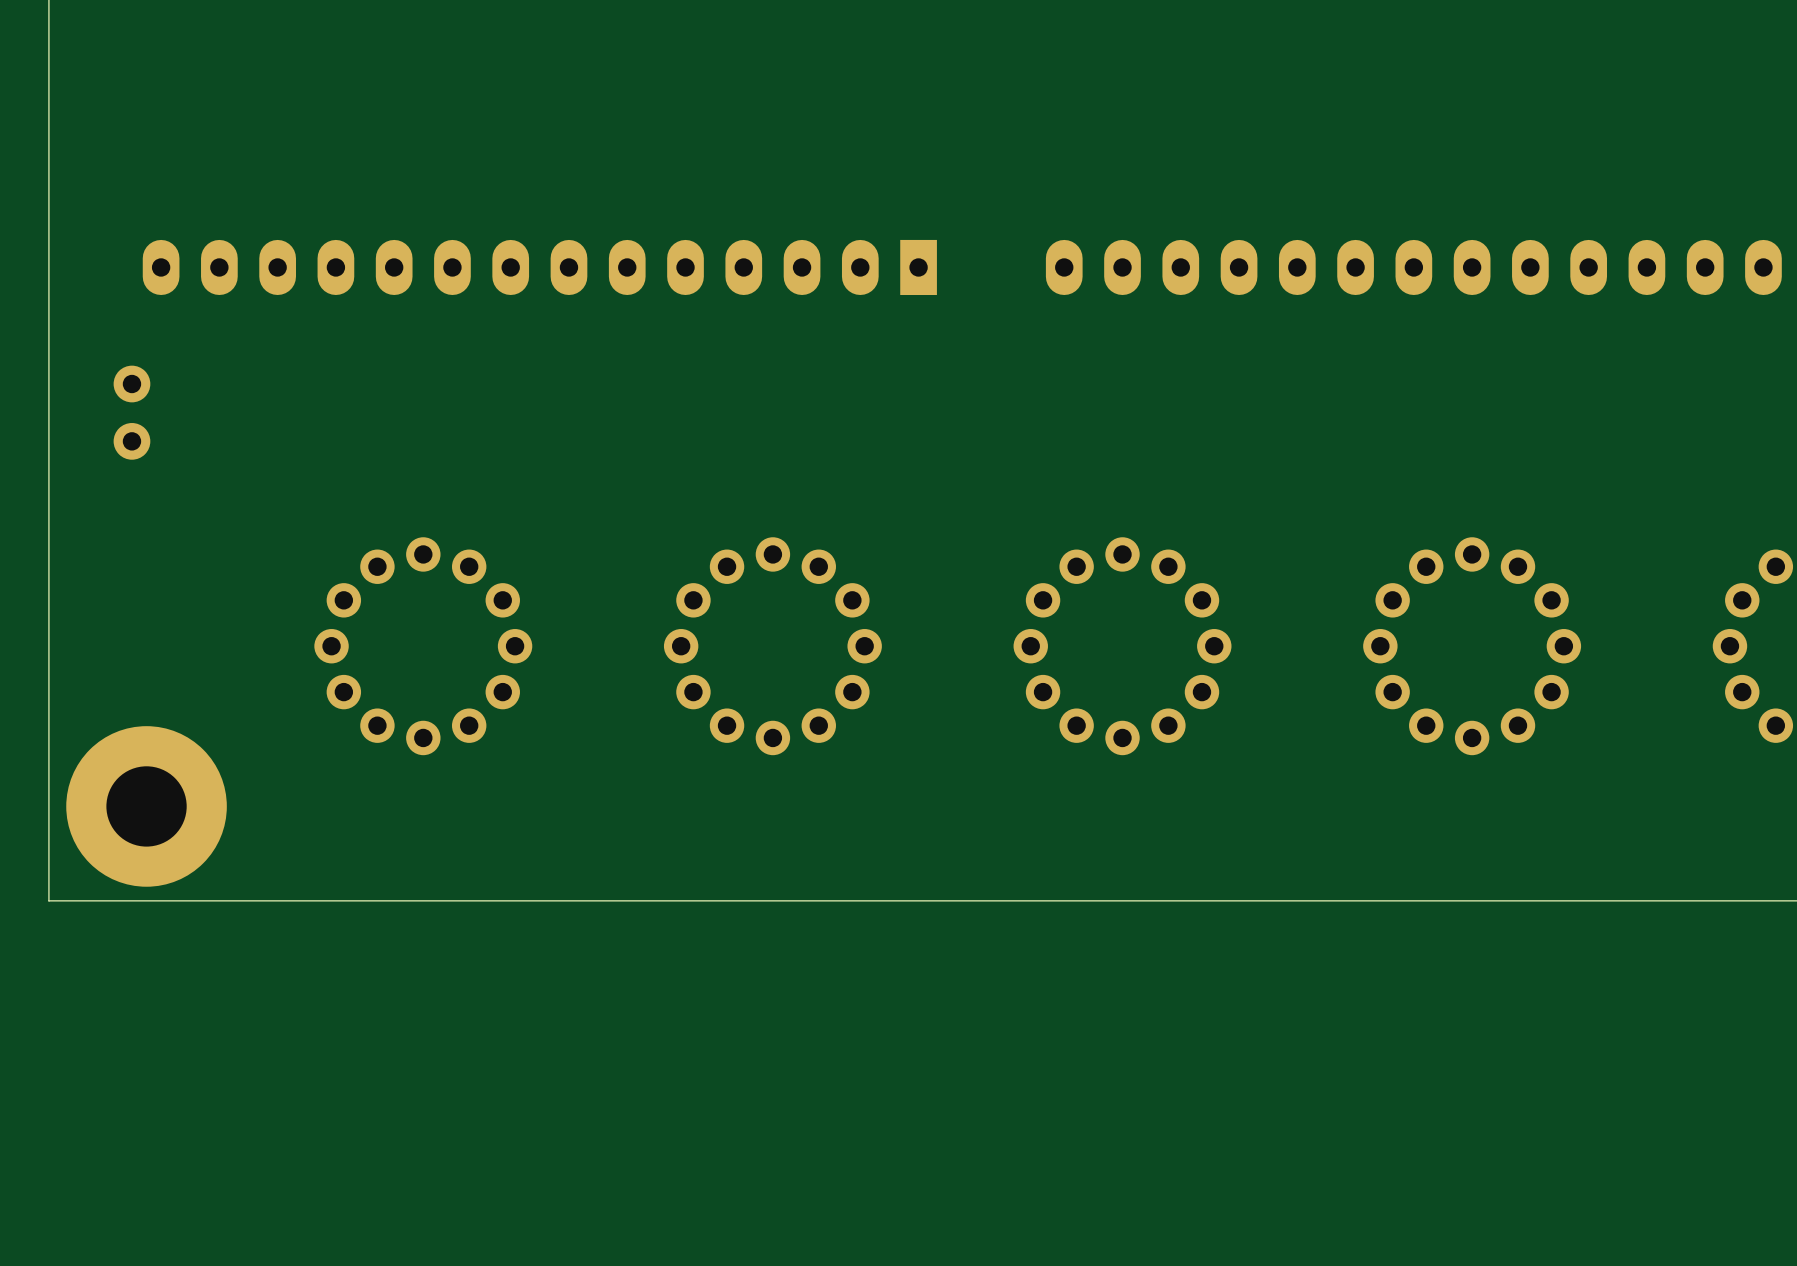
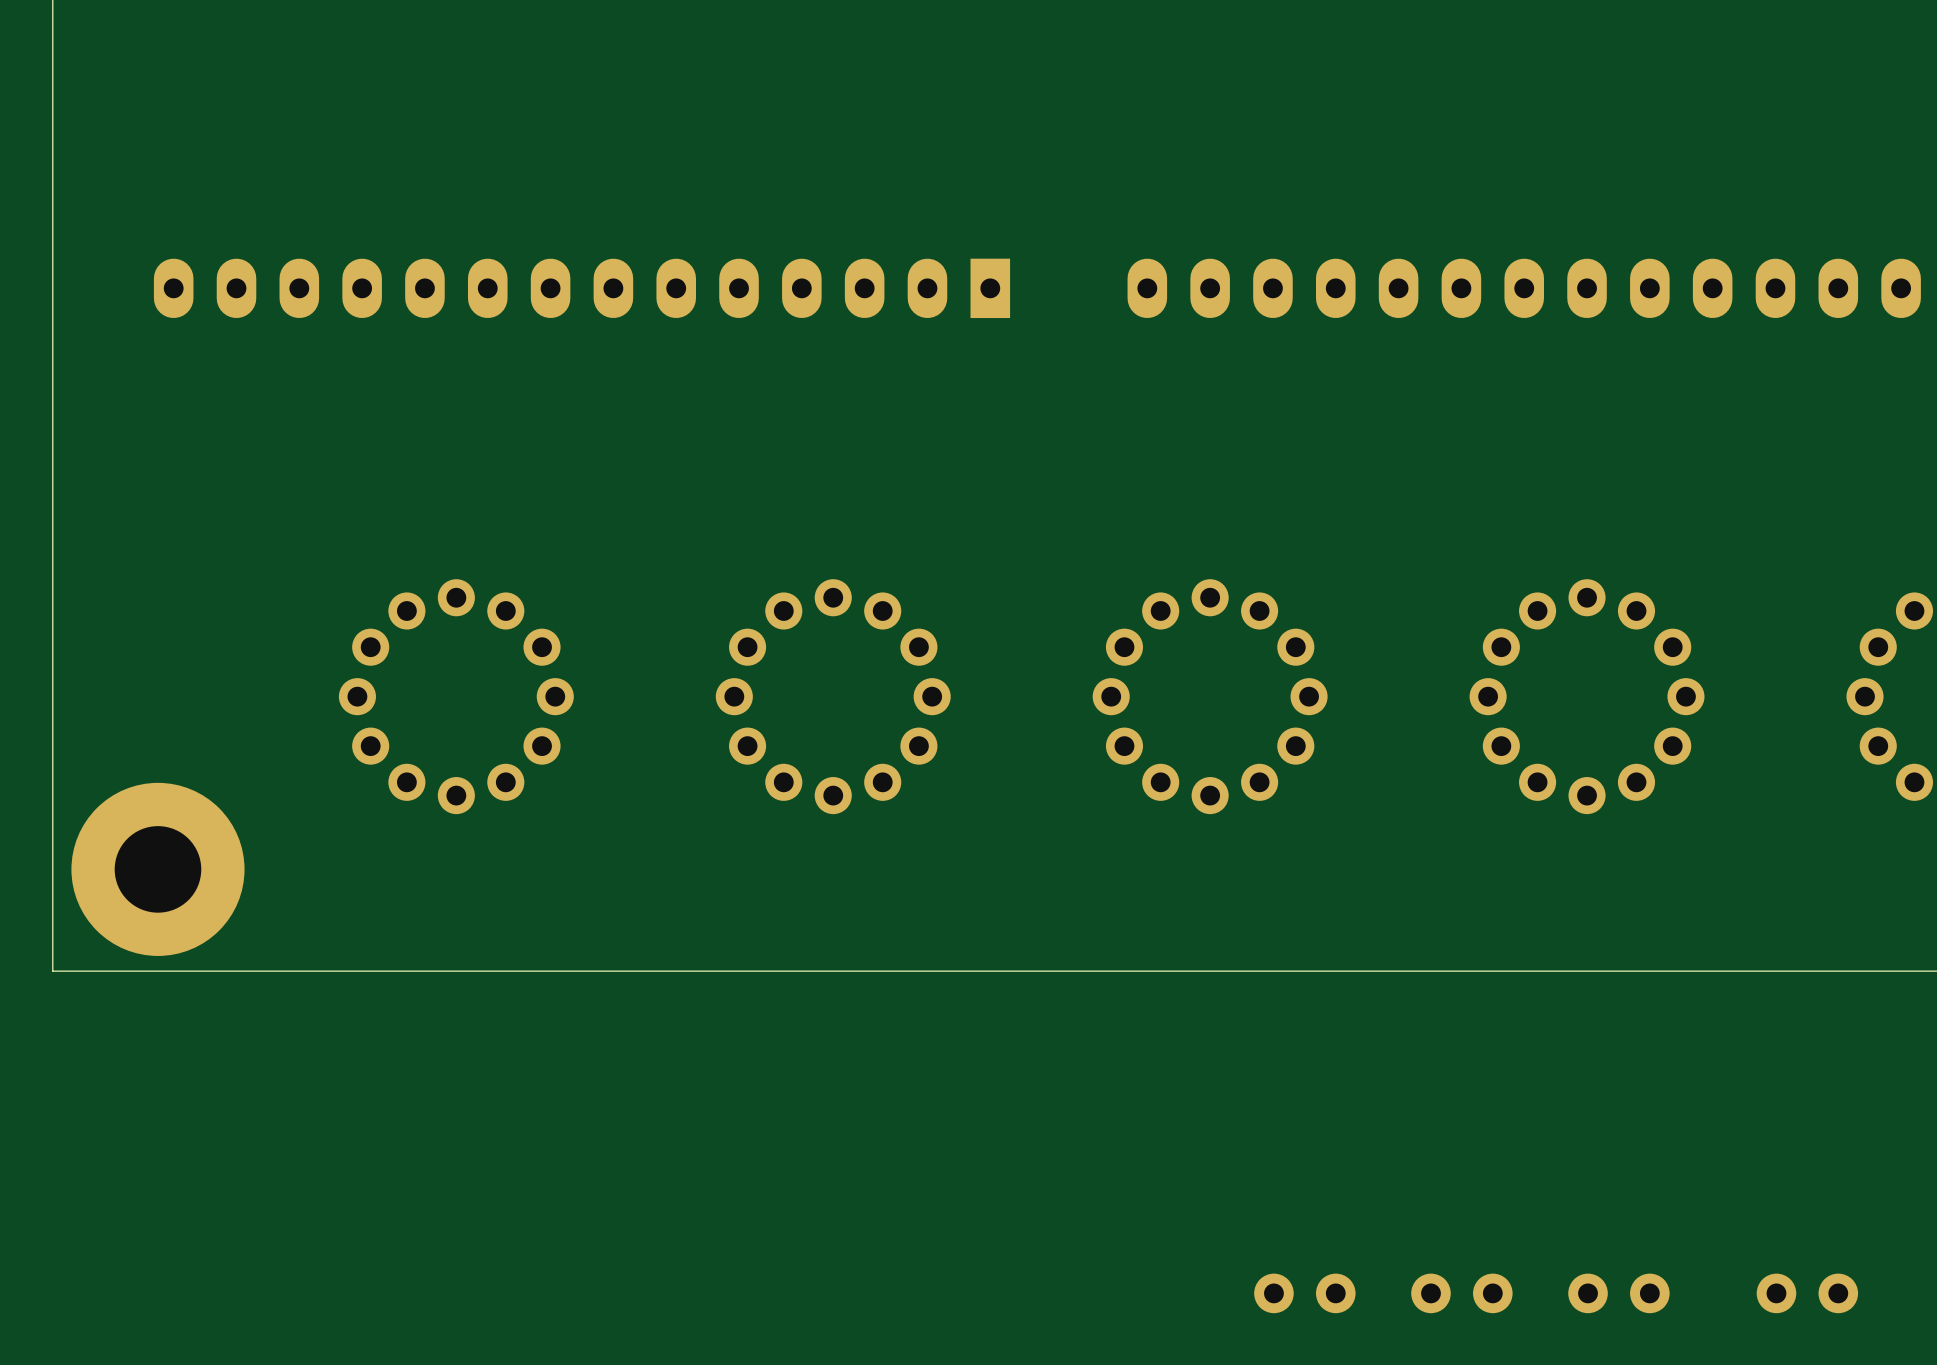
part: (131, 412) -> none
part: none -> (1304, 1293)
part: none -> (1461, 1293)
part: none -> (1618, 1293)
part: none -> (1807, 1293)

